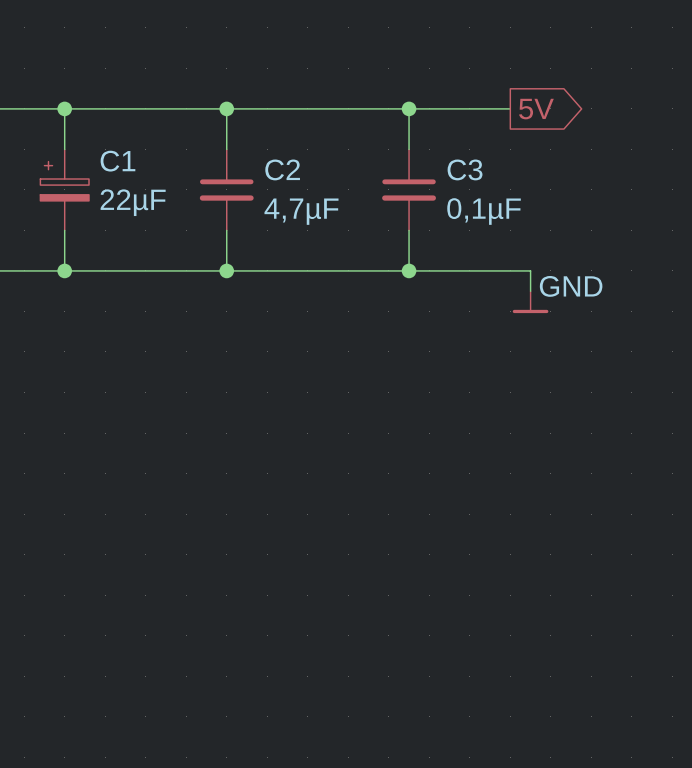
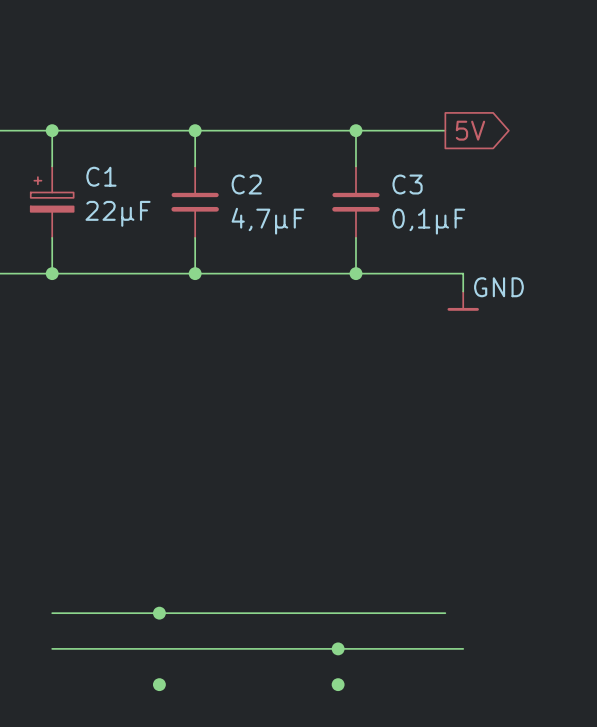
wire: none -> (52, 613) (445, 613)
junction: none -> (159, 613)
wire: none -> (52, 648) (463, 648)
junction: none -> (338, 648)
junction: none -> (159, 684)
junction: none -> (338, 684)

